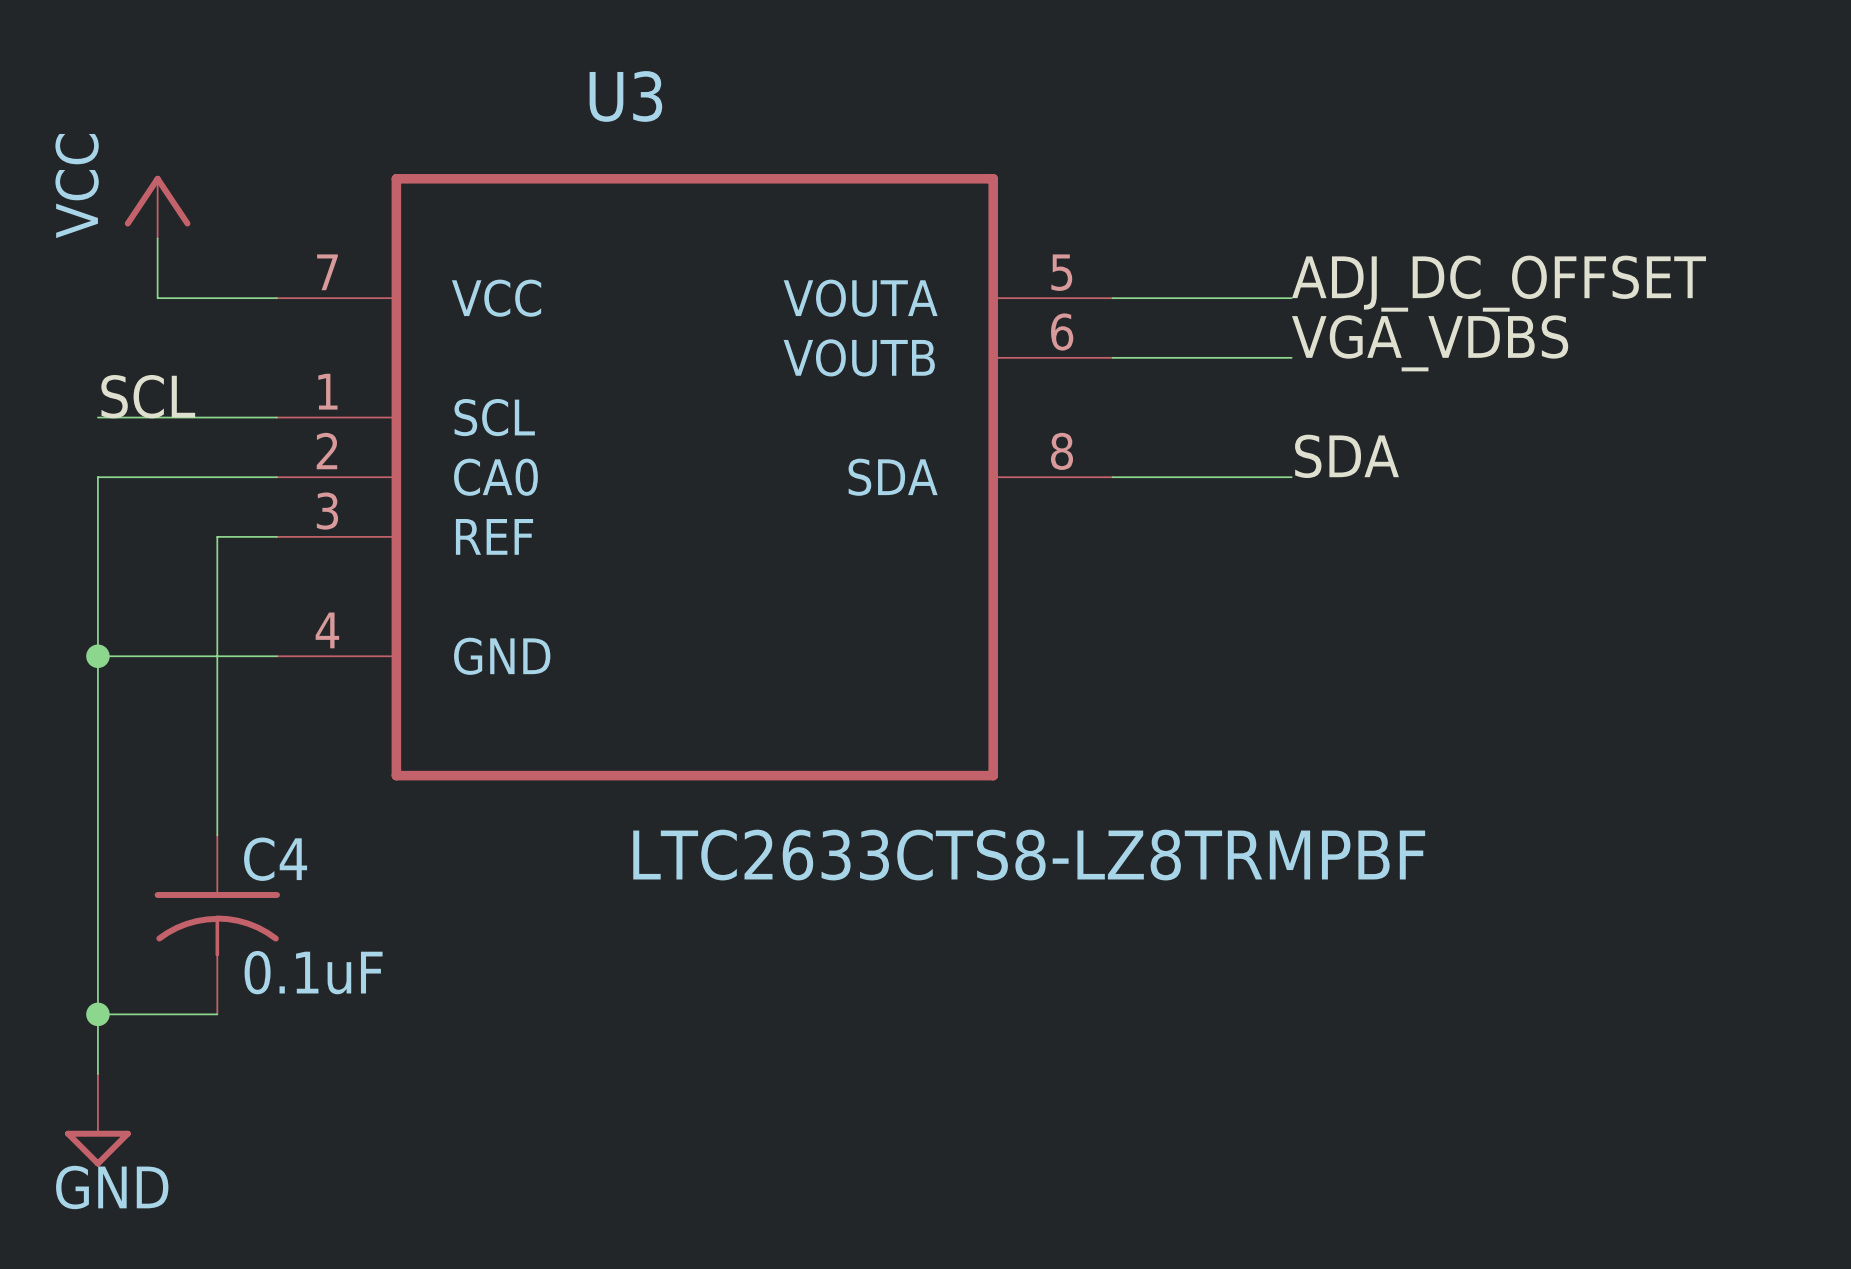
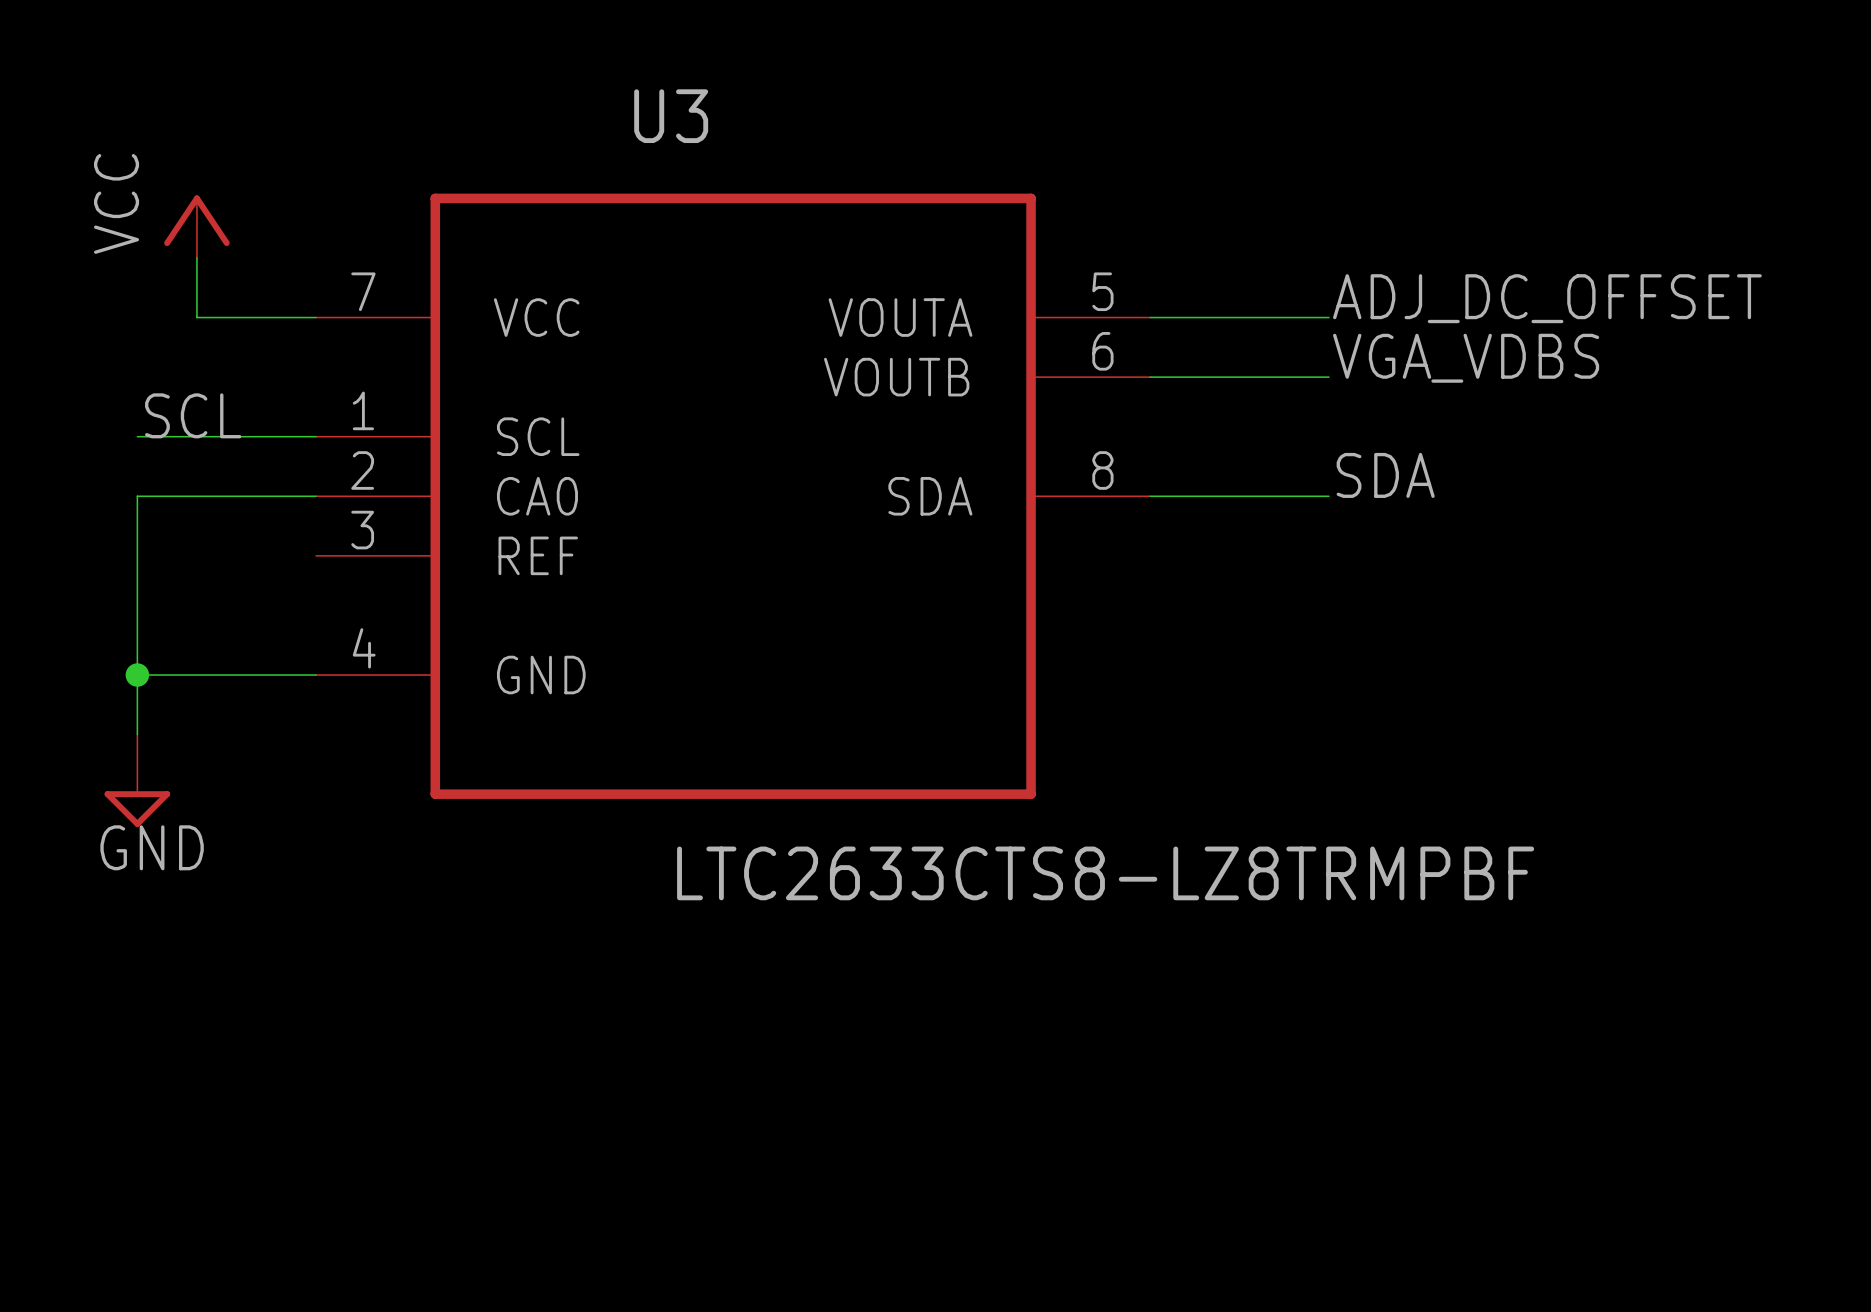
wire: (276, 536) (217, 536) (217, 835) -> none
wire: (97, 715) (97, 1074) -> none
C4: 0.1uF (217, 924) -> none
wire: (97, 1014) (217, 1014) -> none
junction: (97, 1014) -> none
power symbol position: GND (97, 1120) -> GND (137, 780)

